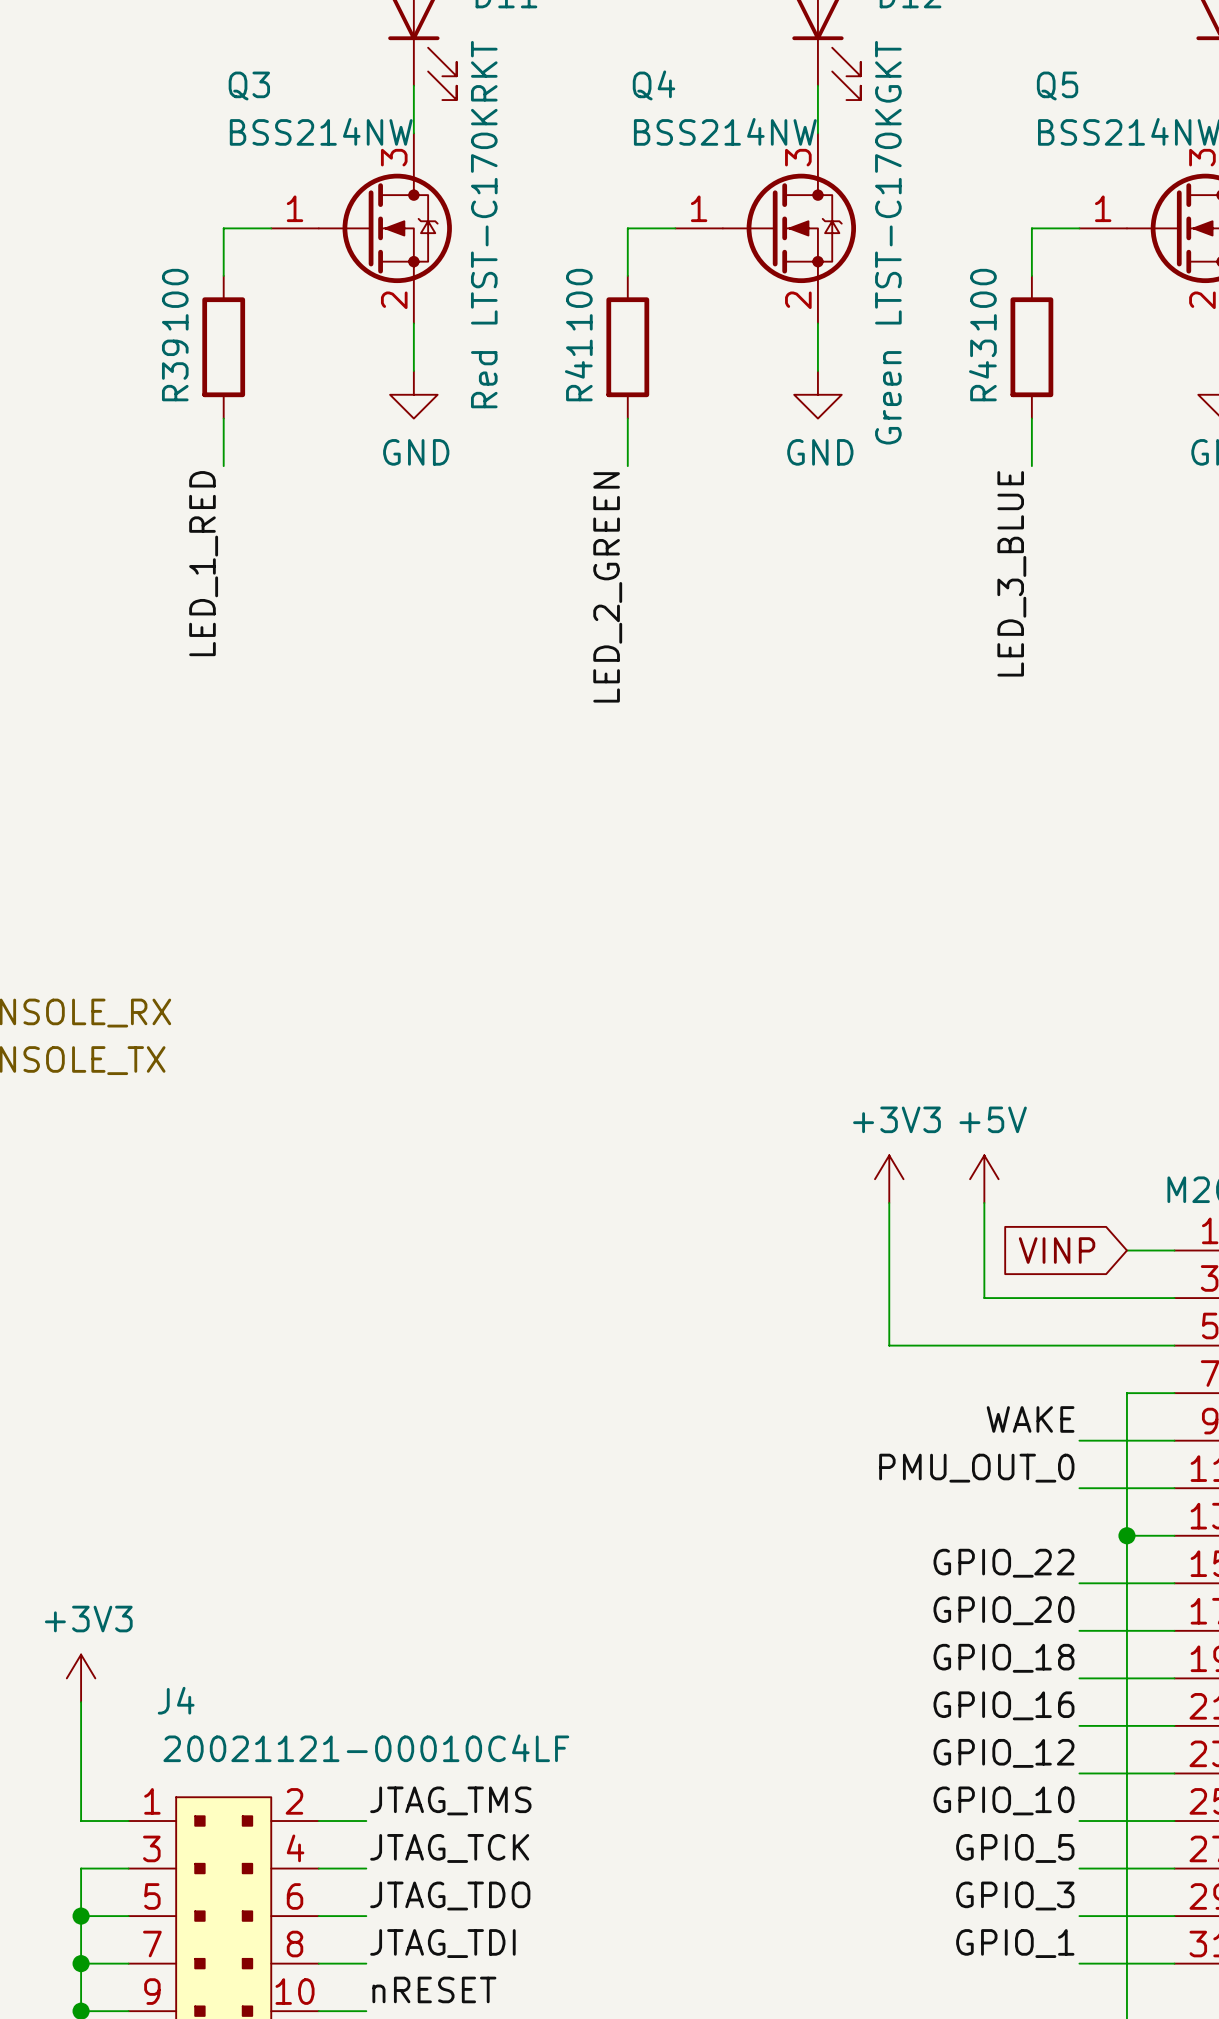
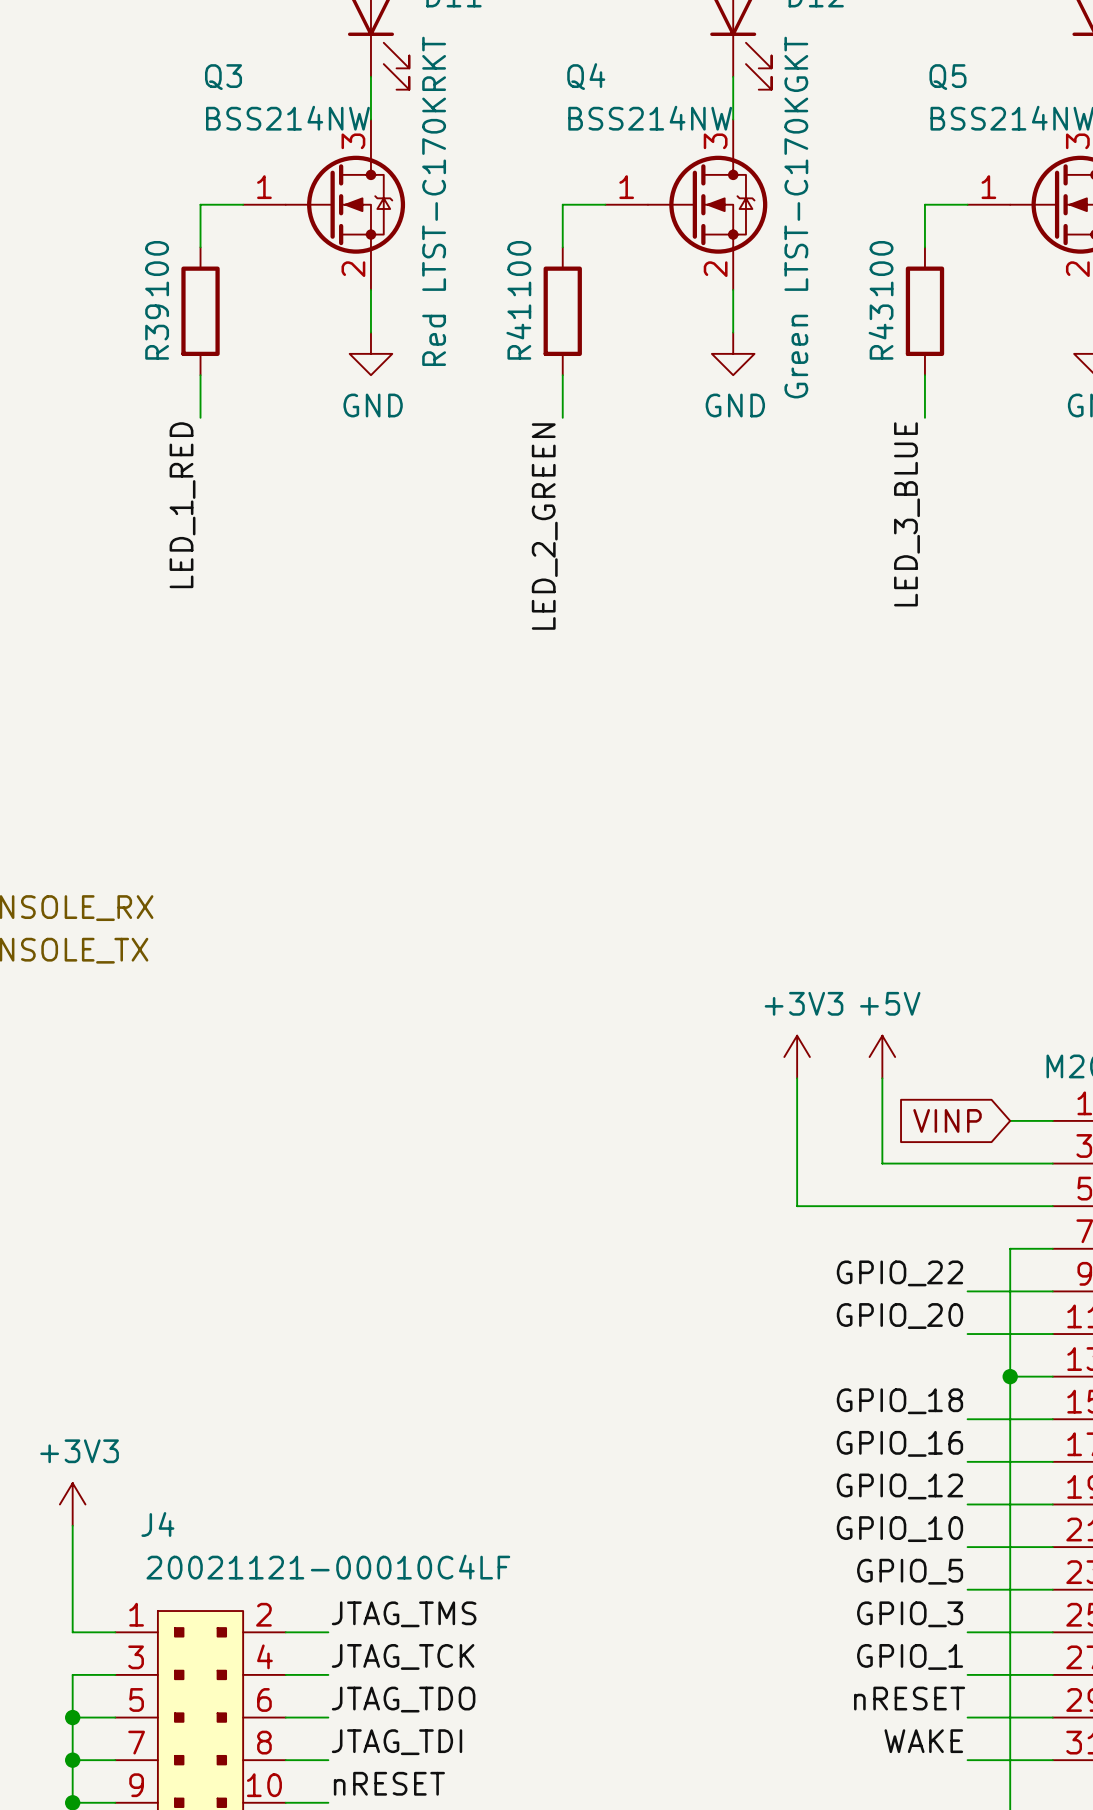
label: WAKE (1030, 1419) -> GPIO_22 (899, 1273)
label: PMU_OUT_0 (976, 1468) -> GPIO_20 (899, 1316)
label: GPIO_22 (1003, 1563) -> GPIO_18 (899, 1401)
label: GPIO_20 (1003, 1610) -> GPIO_16 (899, 1443)
label: GPIO_18 (1003, 1658) -> GPIO_12 (899, 1486)
label: GPIO_16 (1003, 1705) -> GPIO_10 (899, 1529)
label: GPIO_12 (1003, 1753) -> GPIO_5 (910, 1571)
label: GPIO_10 (1003, 1800) -> GPIO_3 (910, 1614)
label: GPIO_5 (1015, 1848) -> GPIO_1 (910, 1656)
label: GPIO_3 (1015, 1896) -> nRESET (909, 1698)
label: GPIO_1 (1015, 1943) -> WAKE (923, 1741)

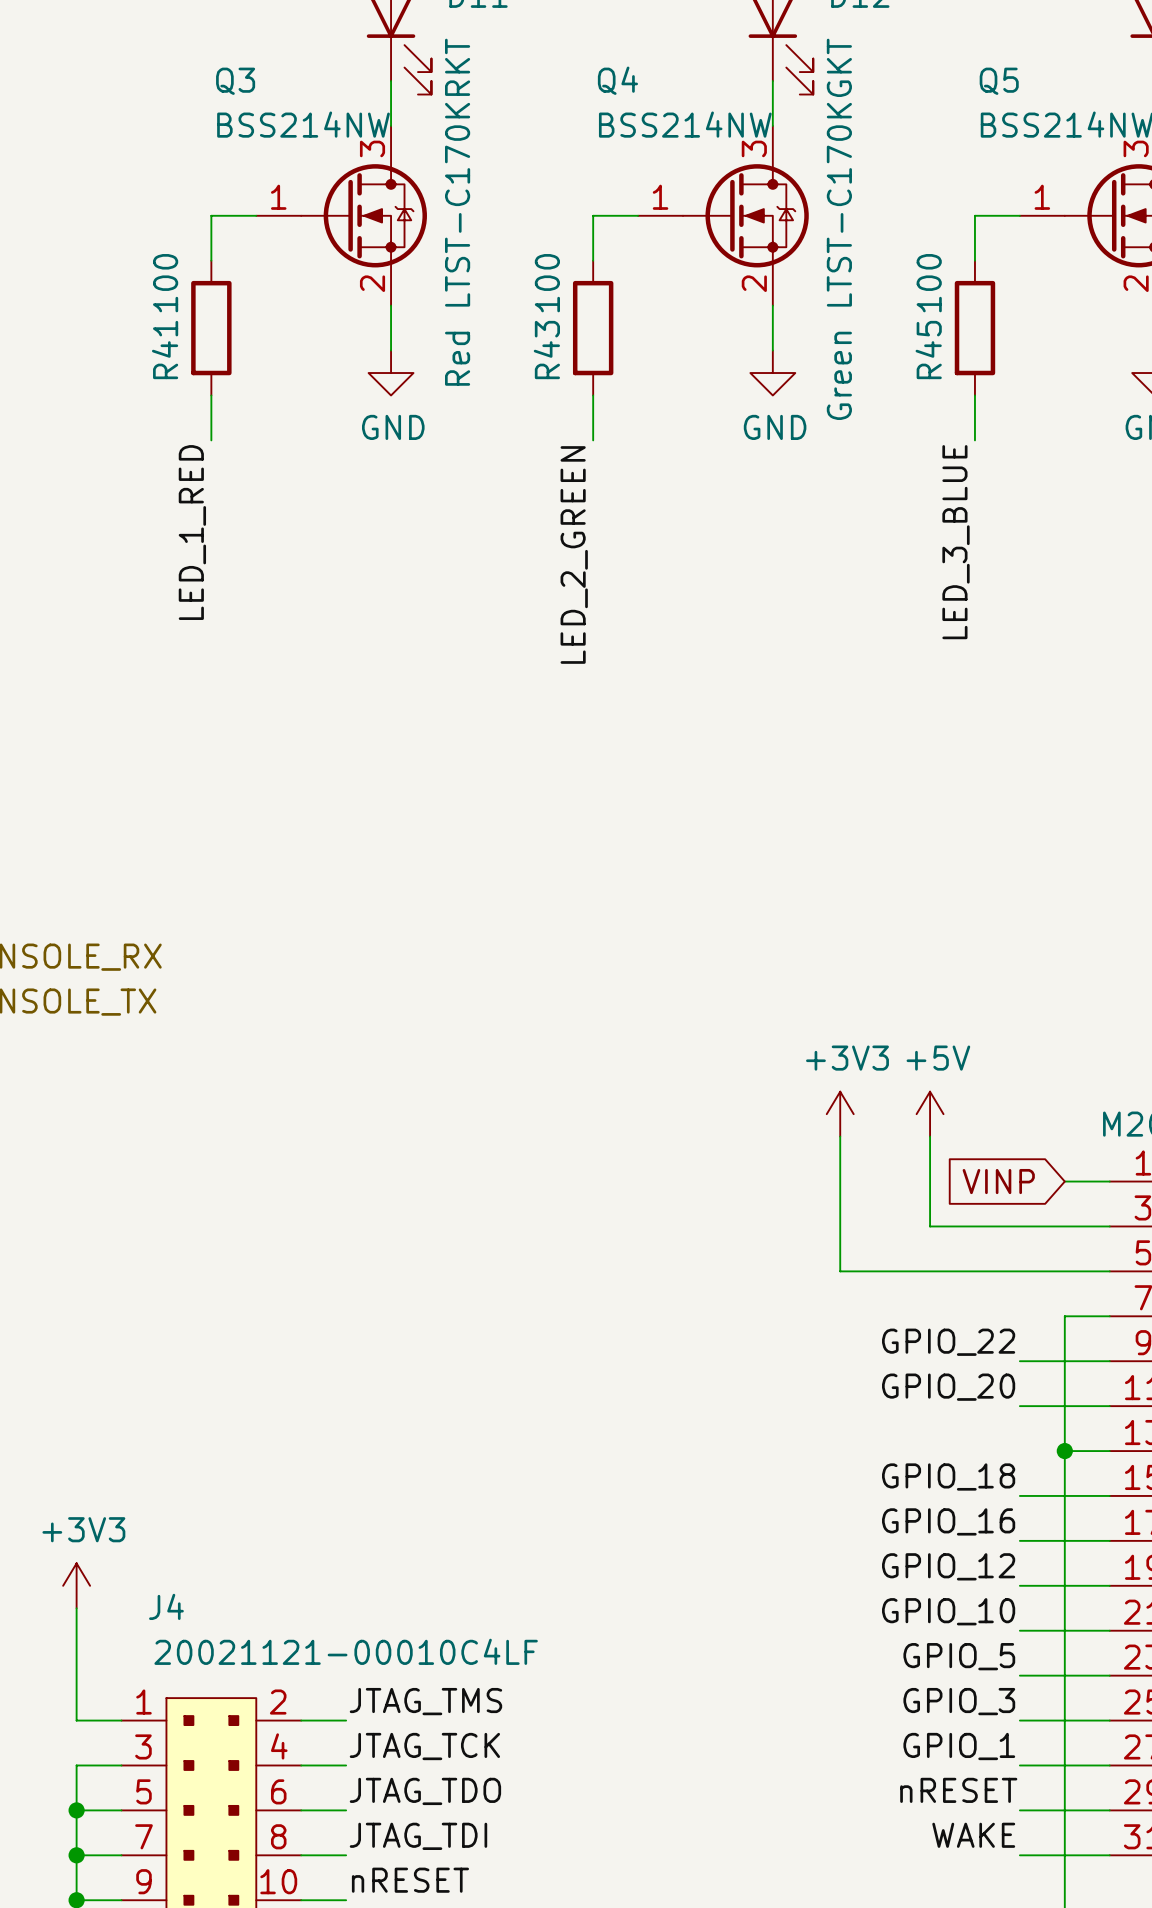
R39 name: R39 (157, 332) -> R41 (165, 350)
R41 name: R41 (518, 332) -> R43 (546, 350)
R43 name: R43 (881, 332) -> R45 (928, 350)

